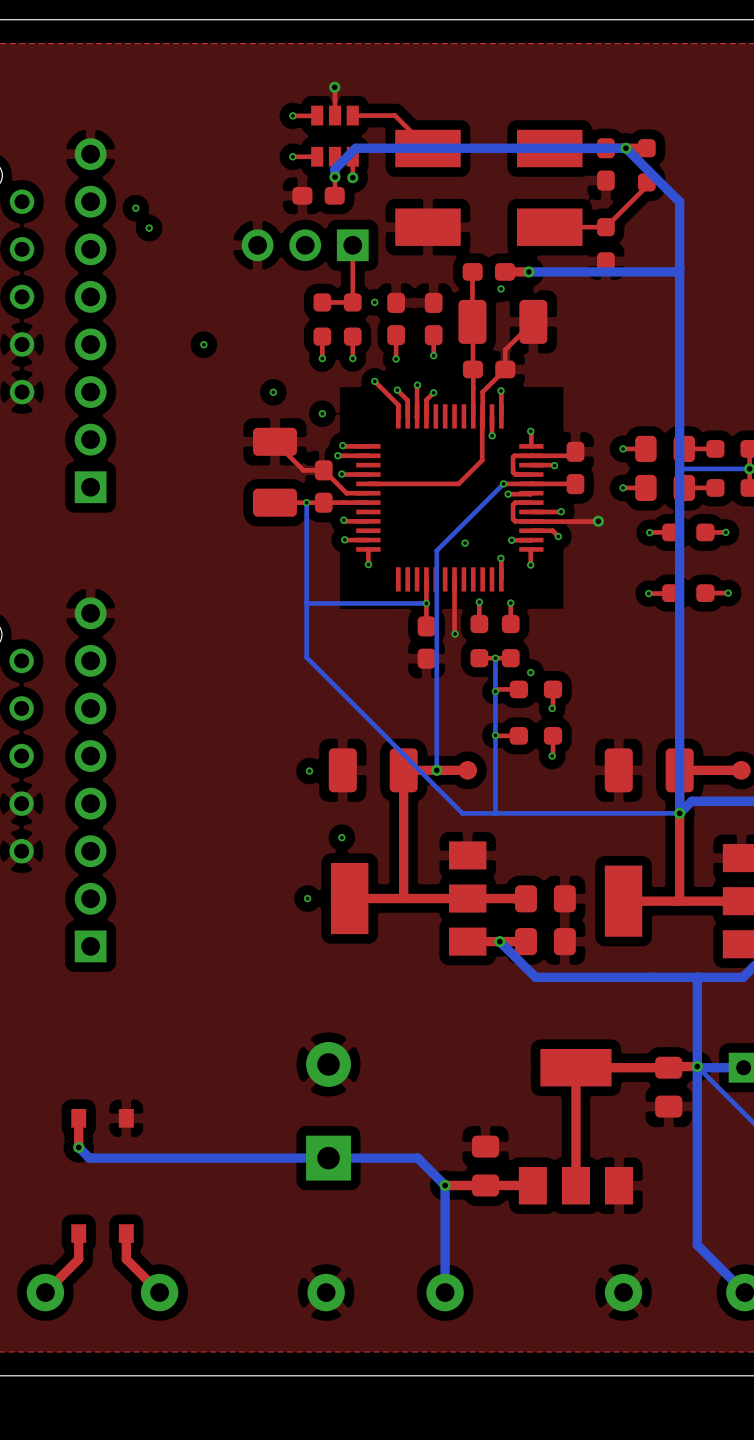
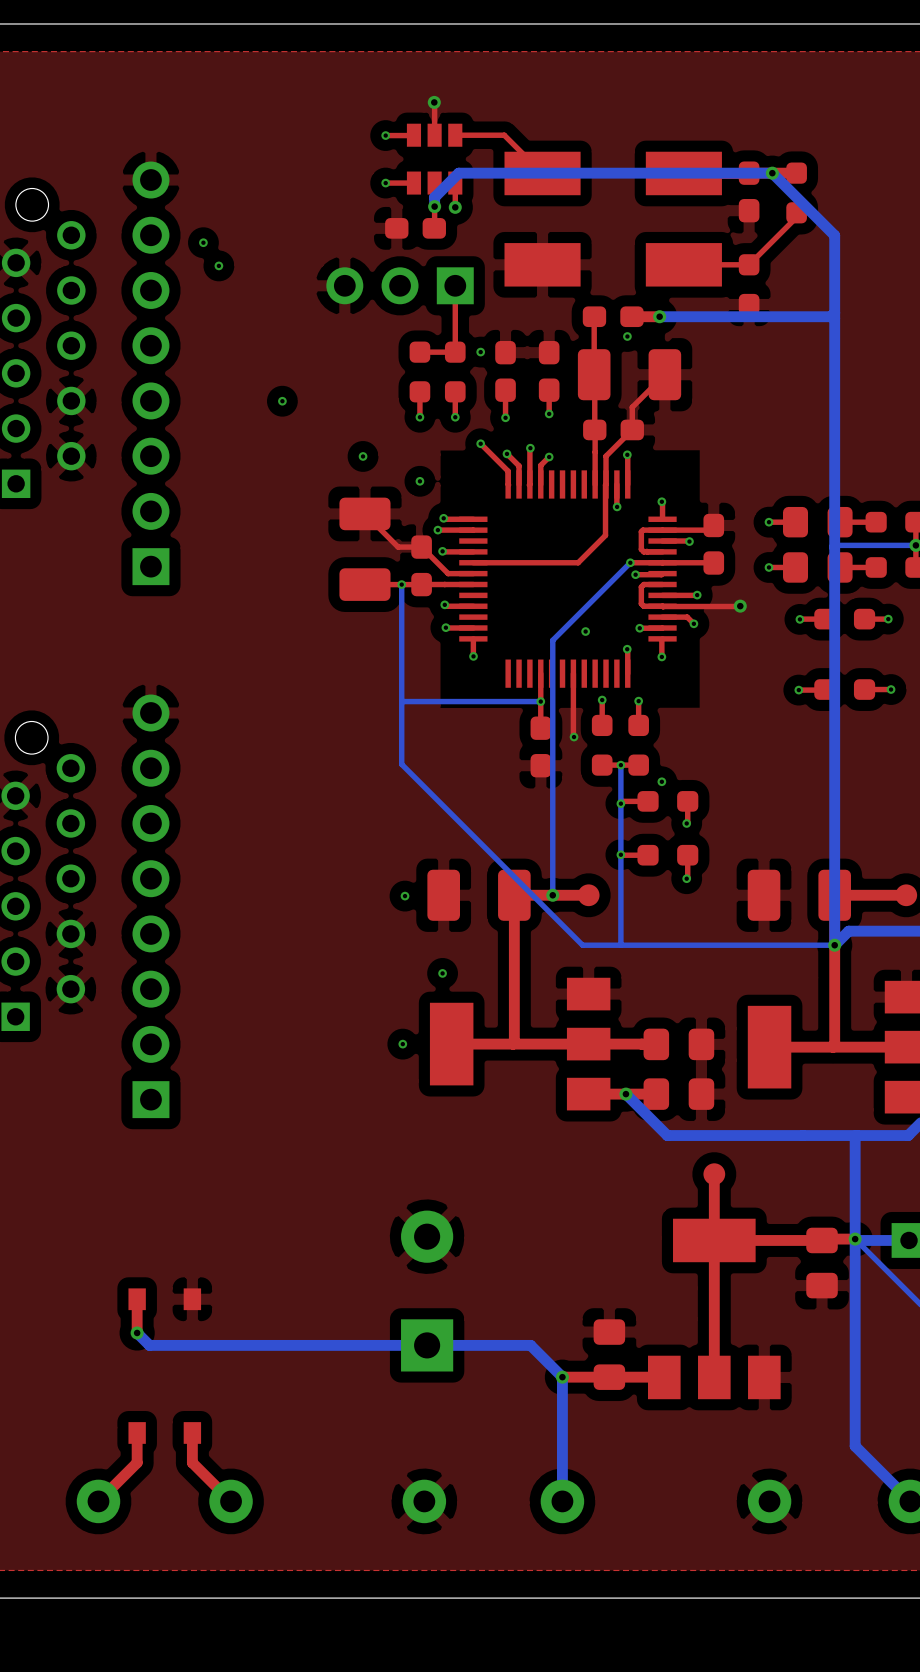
top track: none -> (714, 1174) (714, 1240)
part: none -> (714, 1174)

